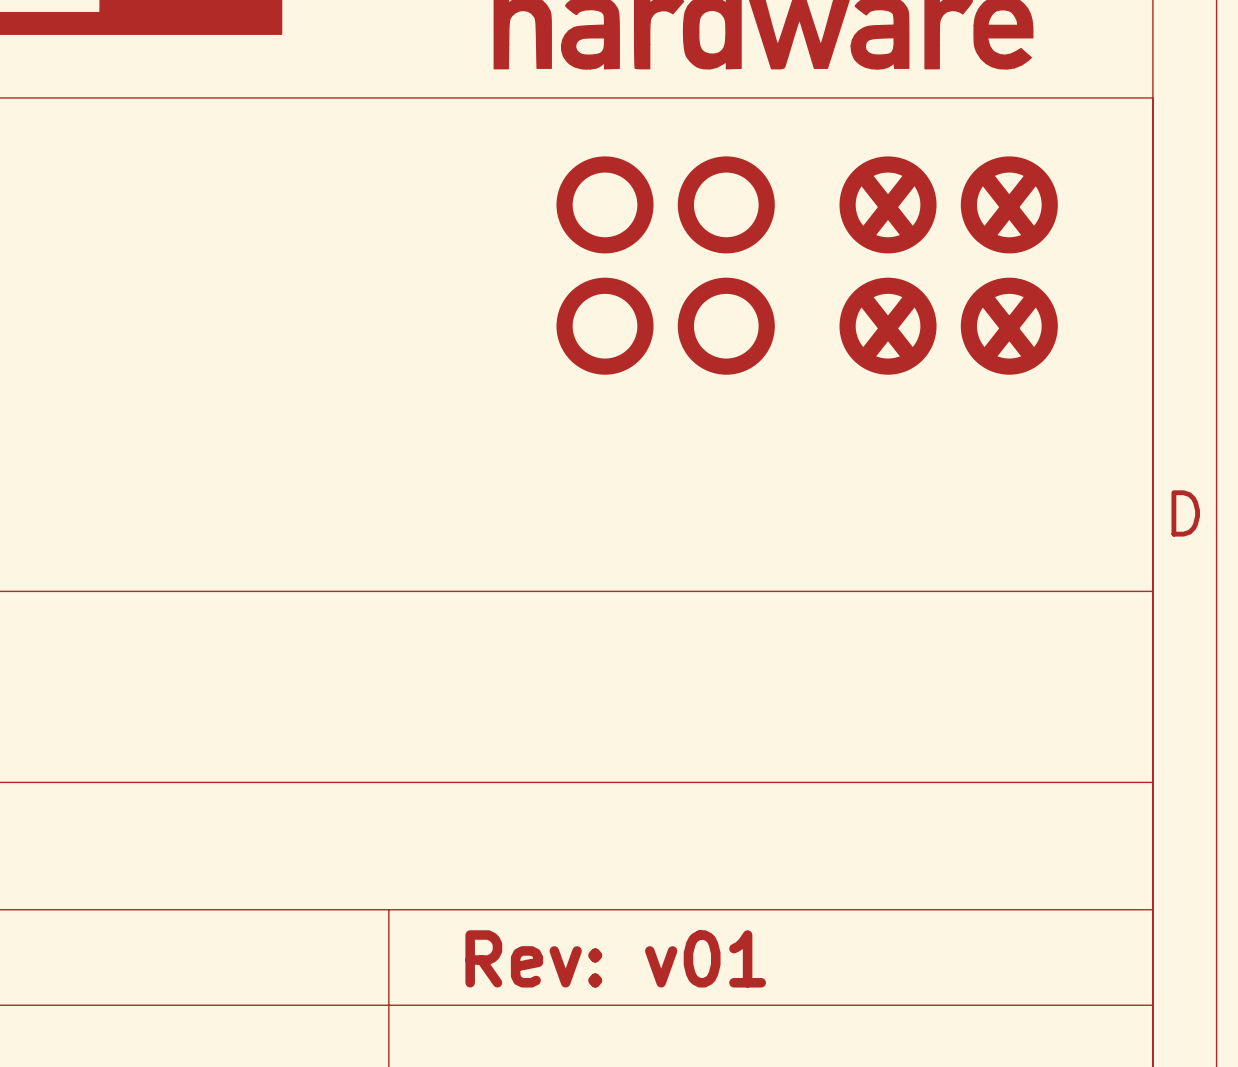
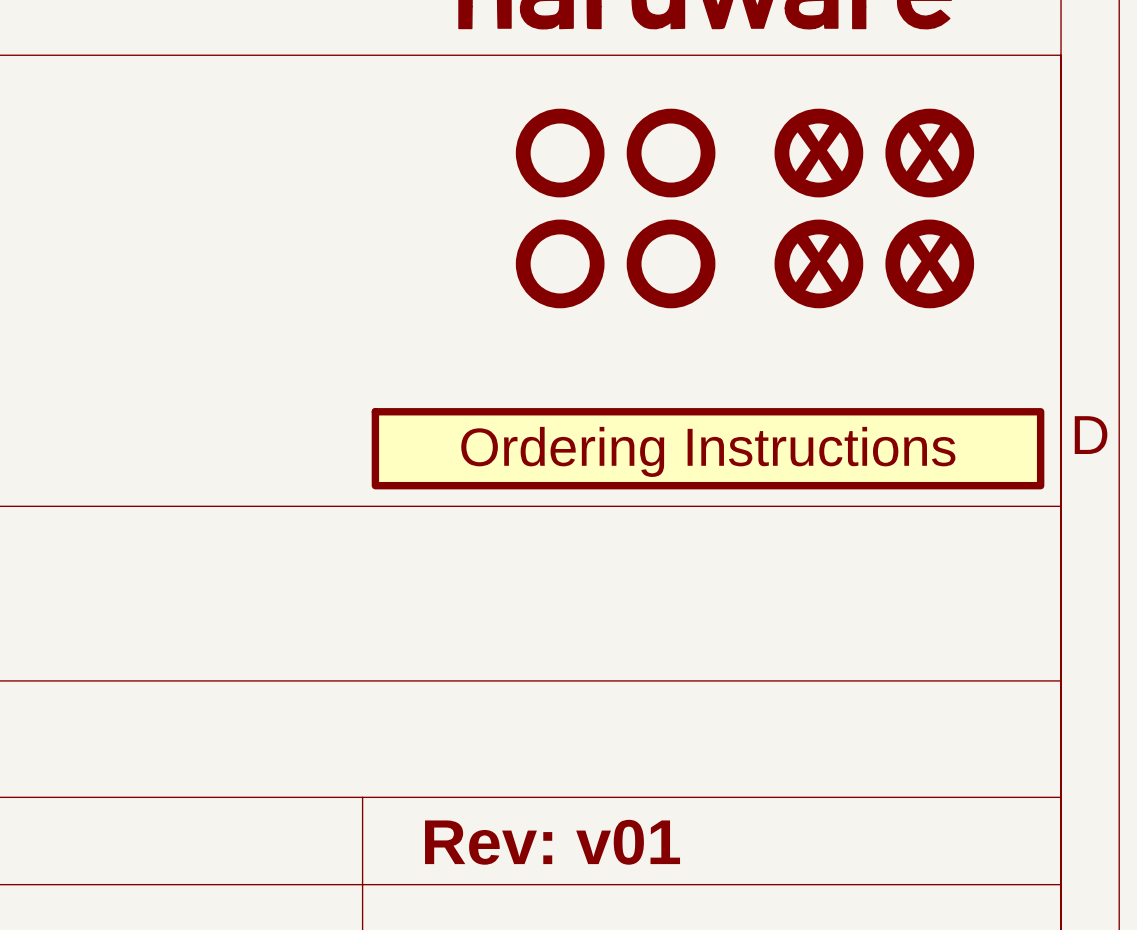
part: none -> (708, 448)

